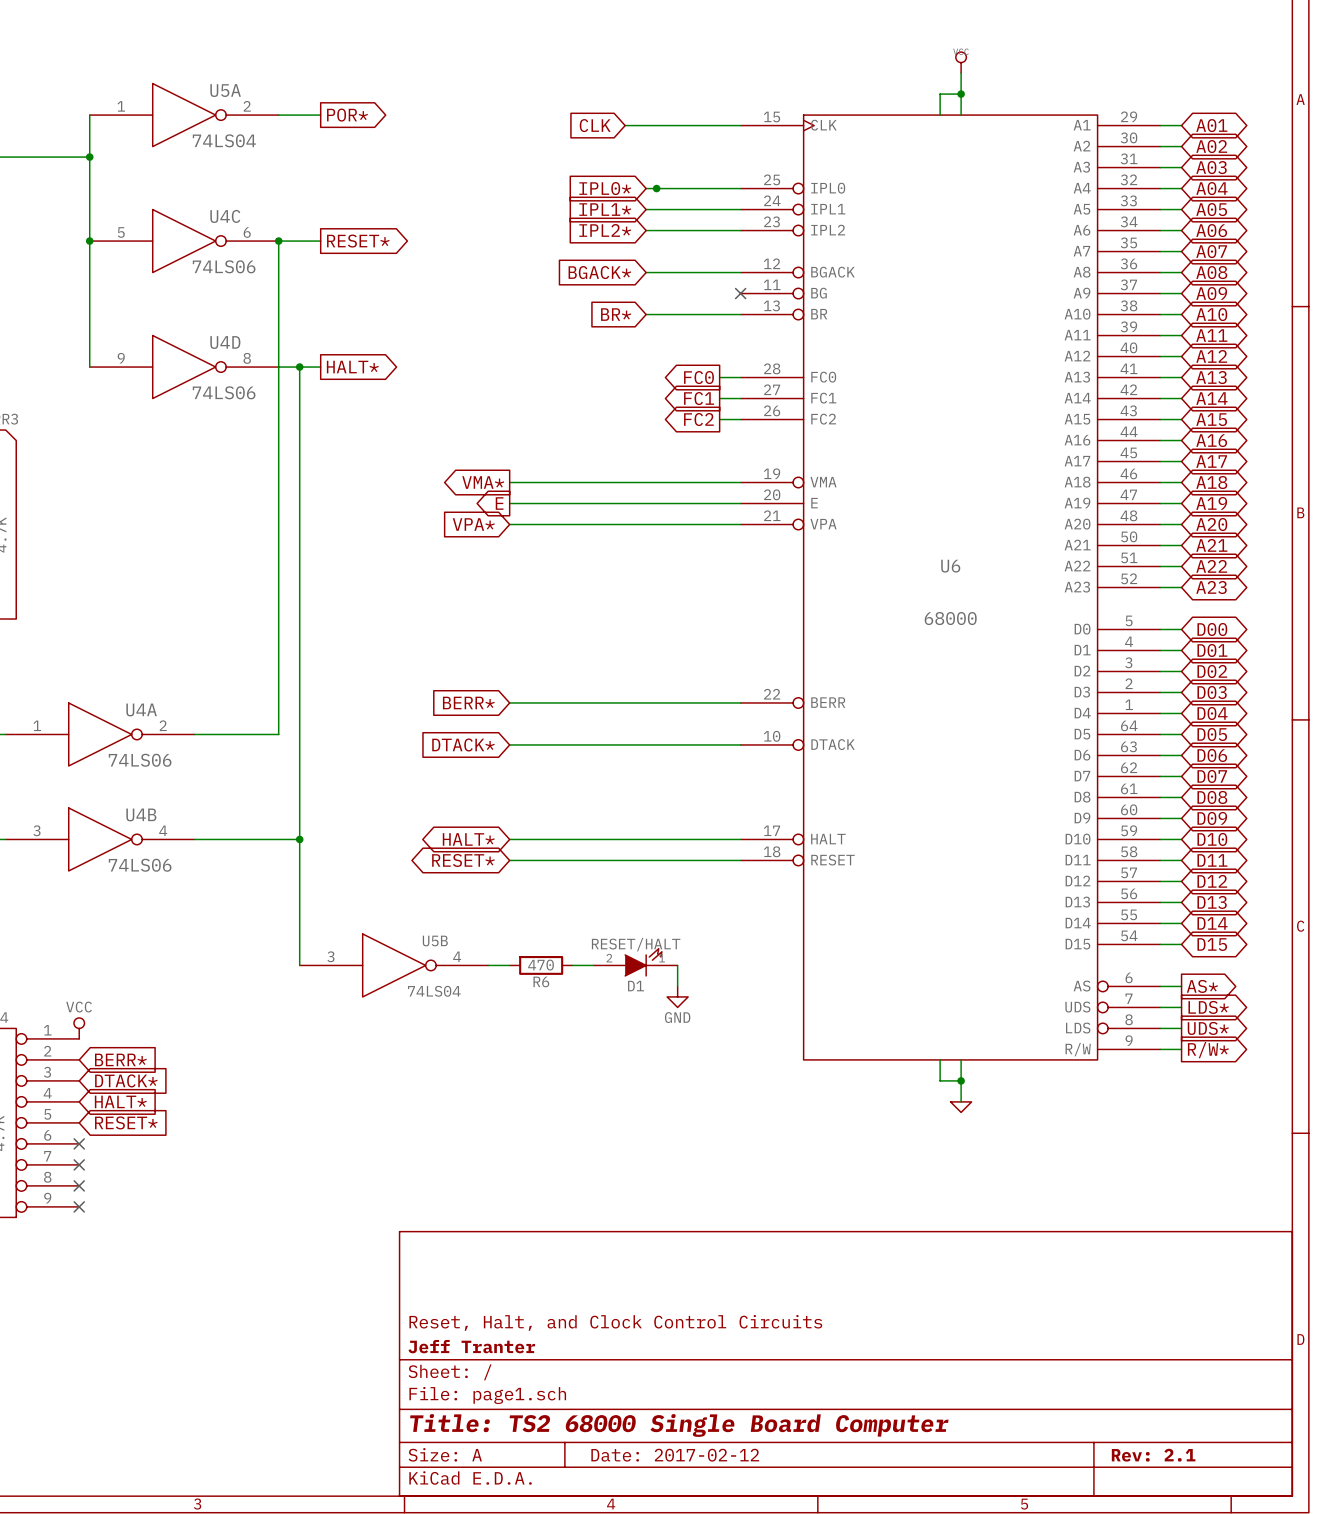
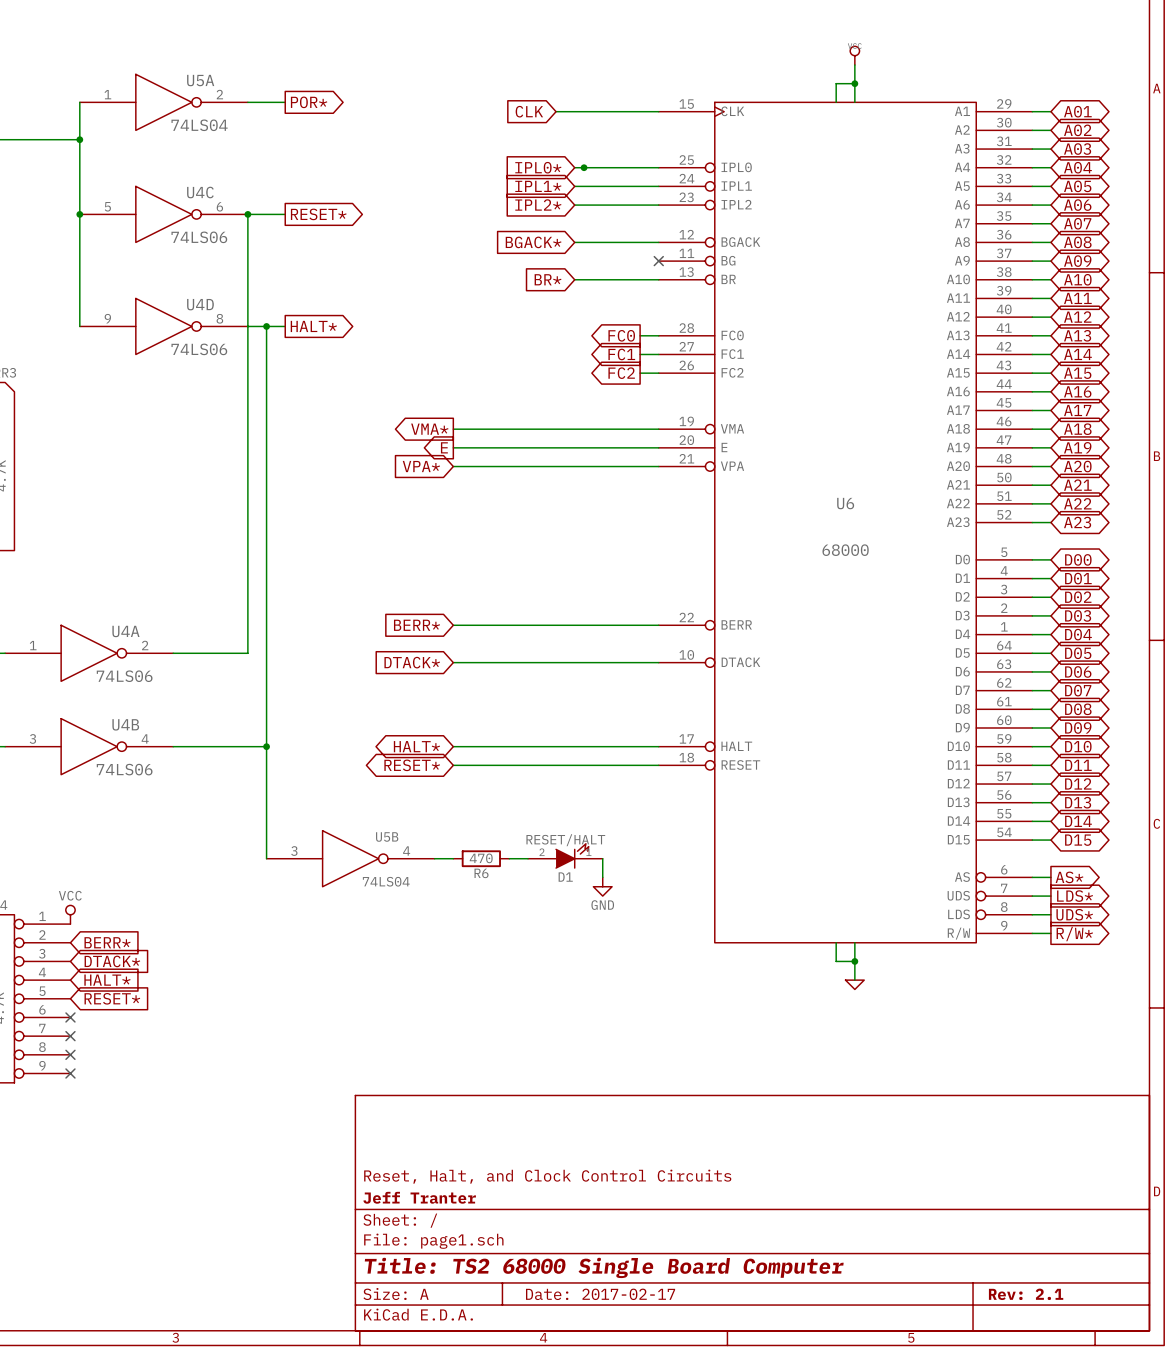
title block: Date: 2017-02-12 (675, 1455) -> Date: 2017-02-17 (600, 1294)

